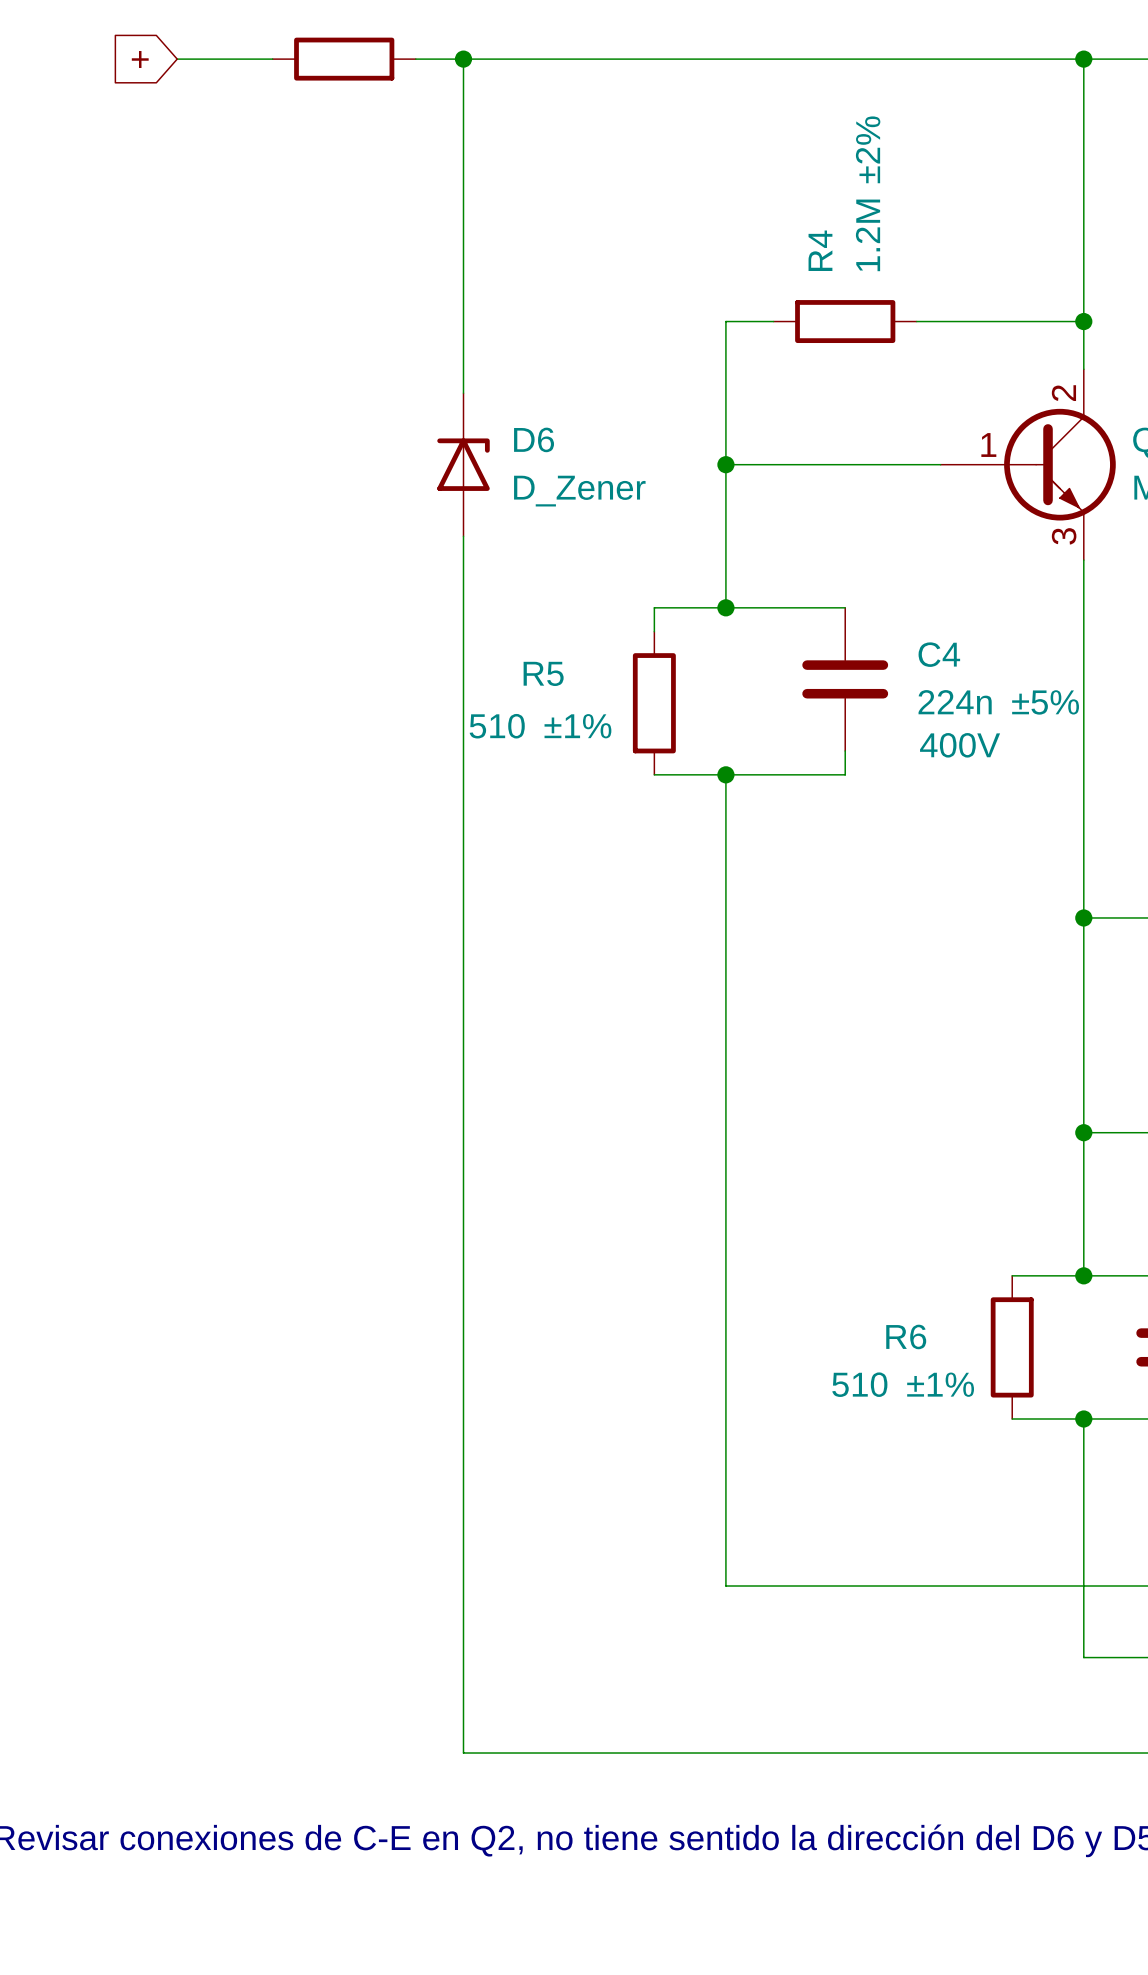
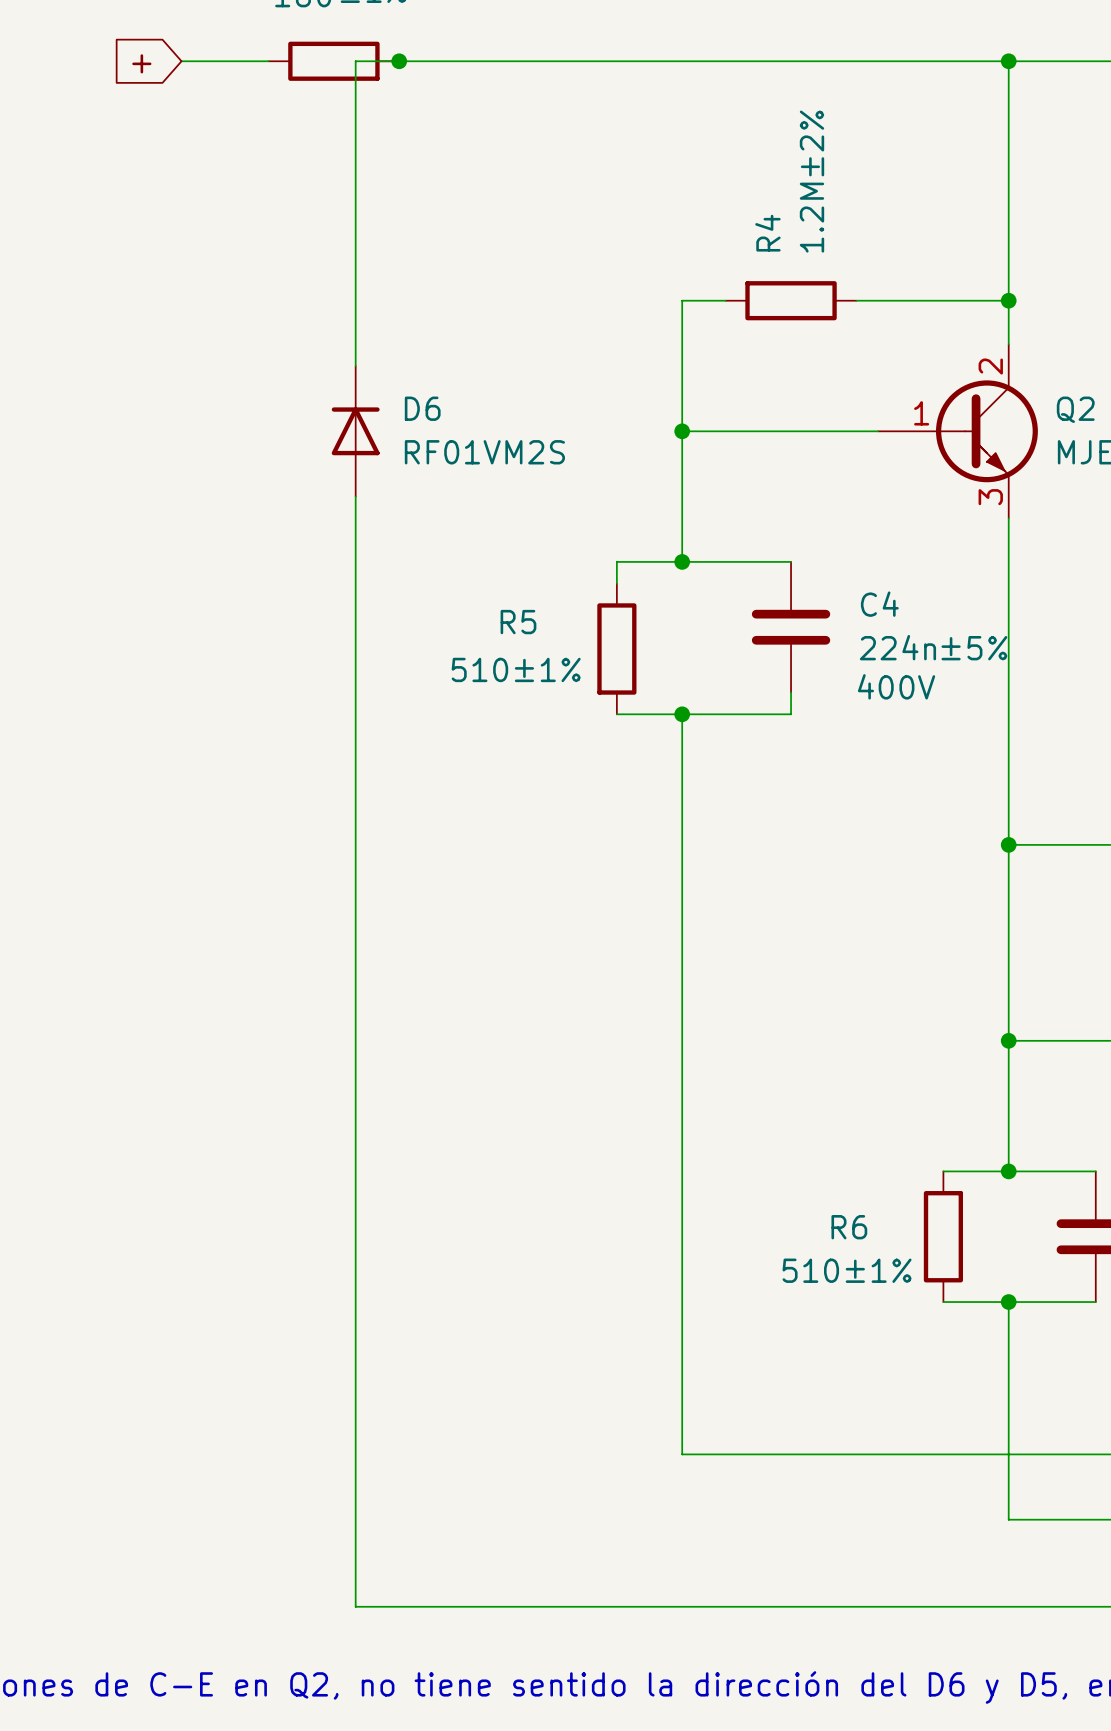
wire: none -> (399, 61) (355, 61) (355, 366)
wire: (463, 59) (463, 393) -> none
junction position: (463, 59) -> (399, 61)
D6 symbol: [437, 393, 490, 537] -> [331, 366, 380, 497]
D6 value: D_Zener (579, 491) -> RF01VM2S (484, 452)
wire: (463, 536) (463, 1753) -> (355, 496) (355, 1606) (442, 1606)

